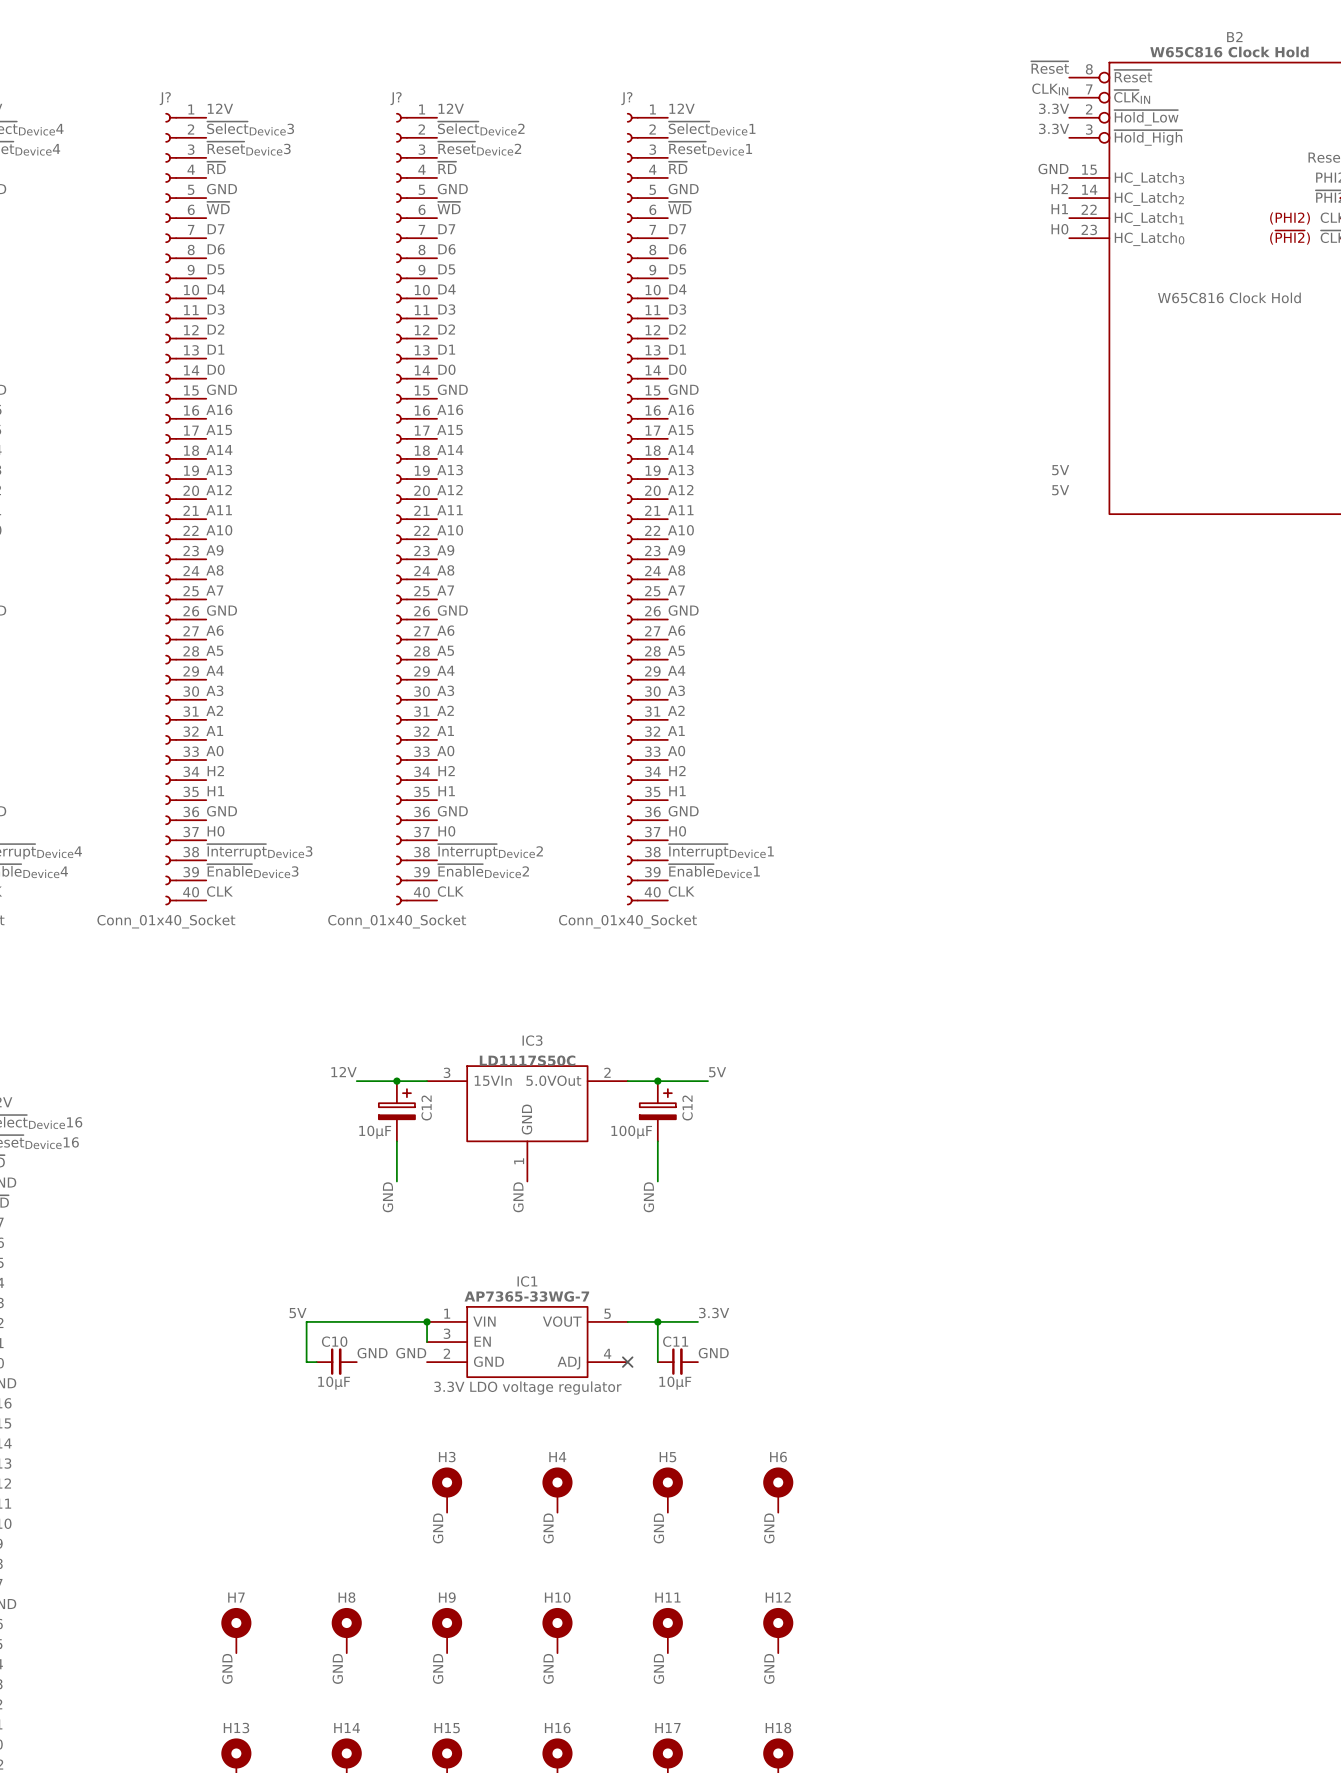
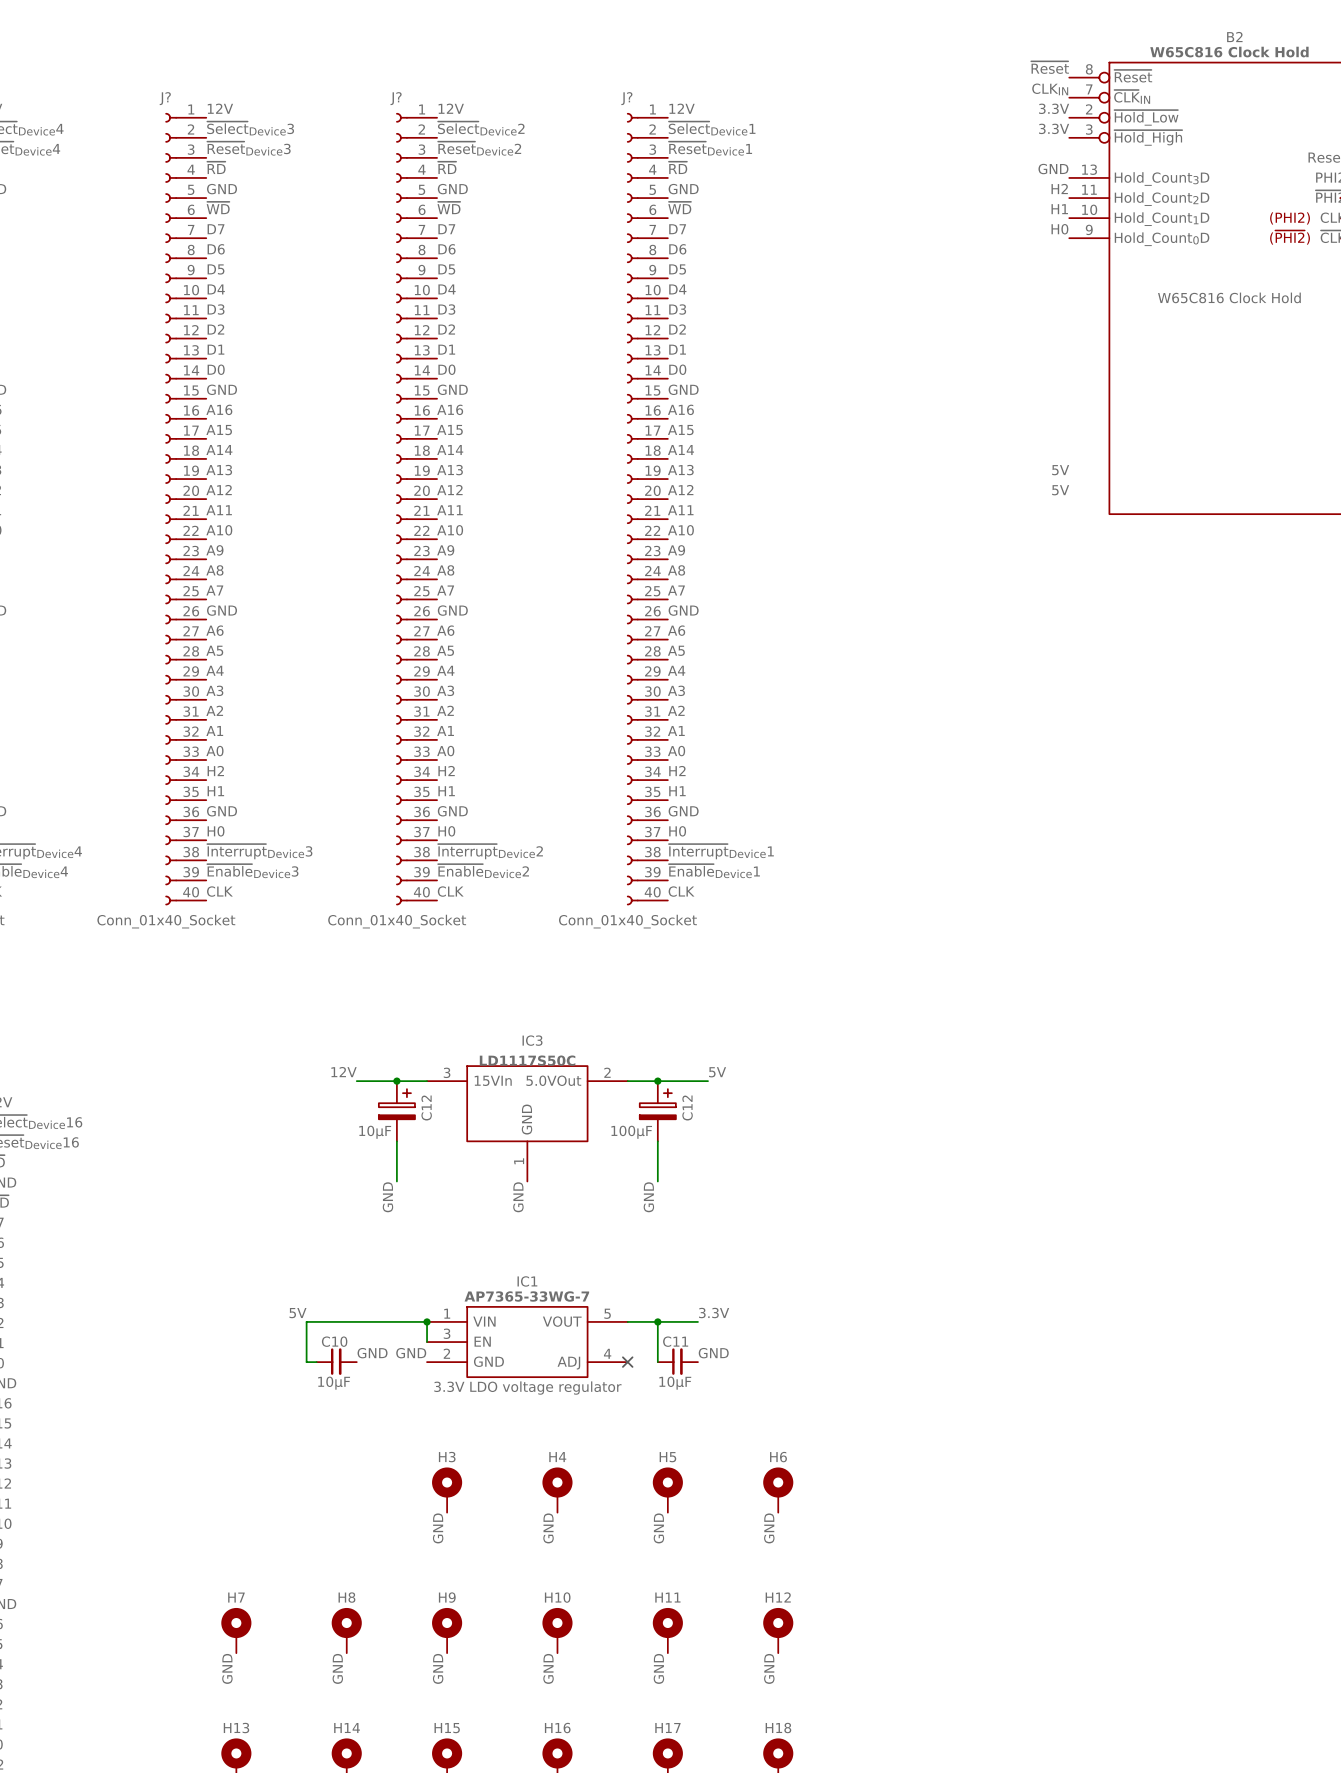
B2 pin number: 15 (1089, 169) -> 13 (1089, 169)
B2 pin name: HC_Latch3 (1149, 179) -> Hold_Count3D (1162, 179)
B2 pin number: 14 (1089, 189) -> 11 (1089, 189)
B2 pin name: HC_Latch2 (1149, 199) -> Hold_Count2D (1162, 199)
B2 pin number: 22 (1089, 209) -> 10 (1089, 209)
B2 pin name: HC_Latch1 (1149, 219) -> Hold_Count1D (1162, 219)
B2 pin number: 23 (1089, 229) -> 9 (1089, 229)
B2 pin name: HC_Latch0 (1149, 239) -> Hold_Count0D (1162, 239)

